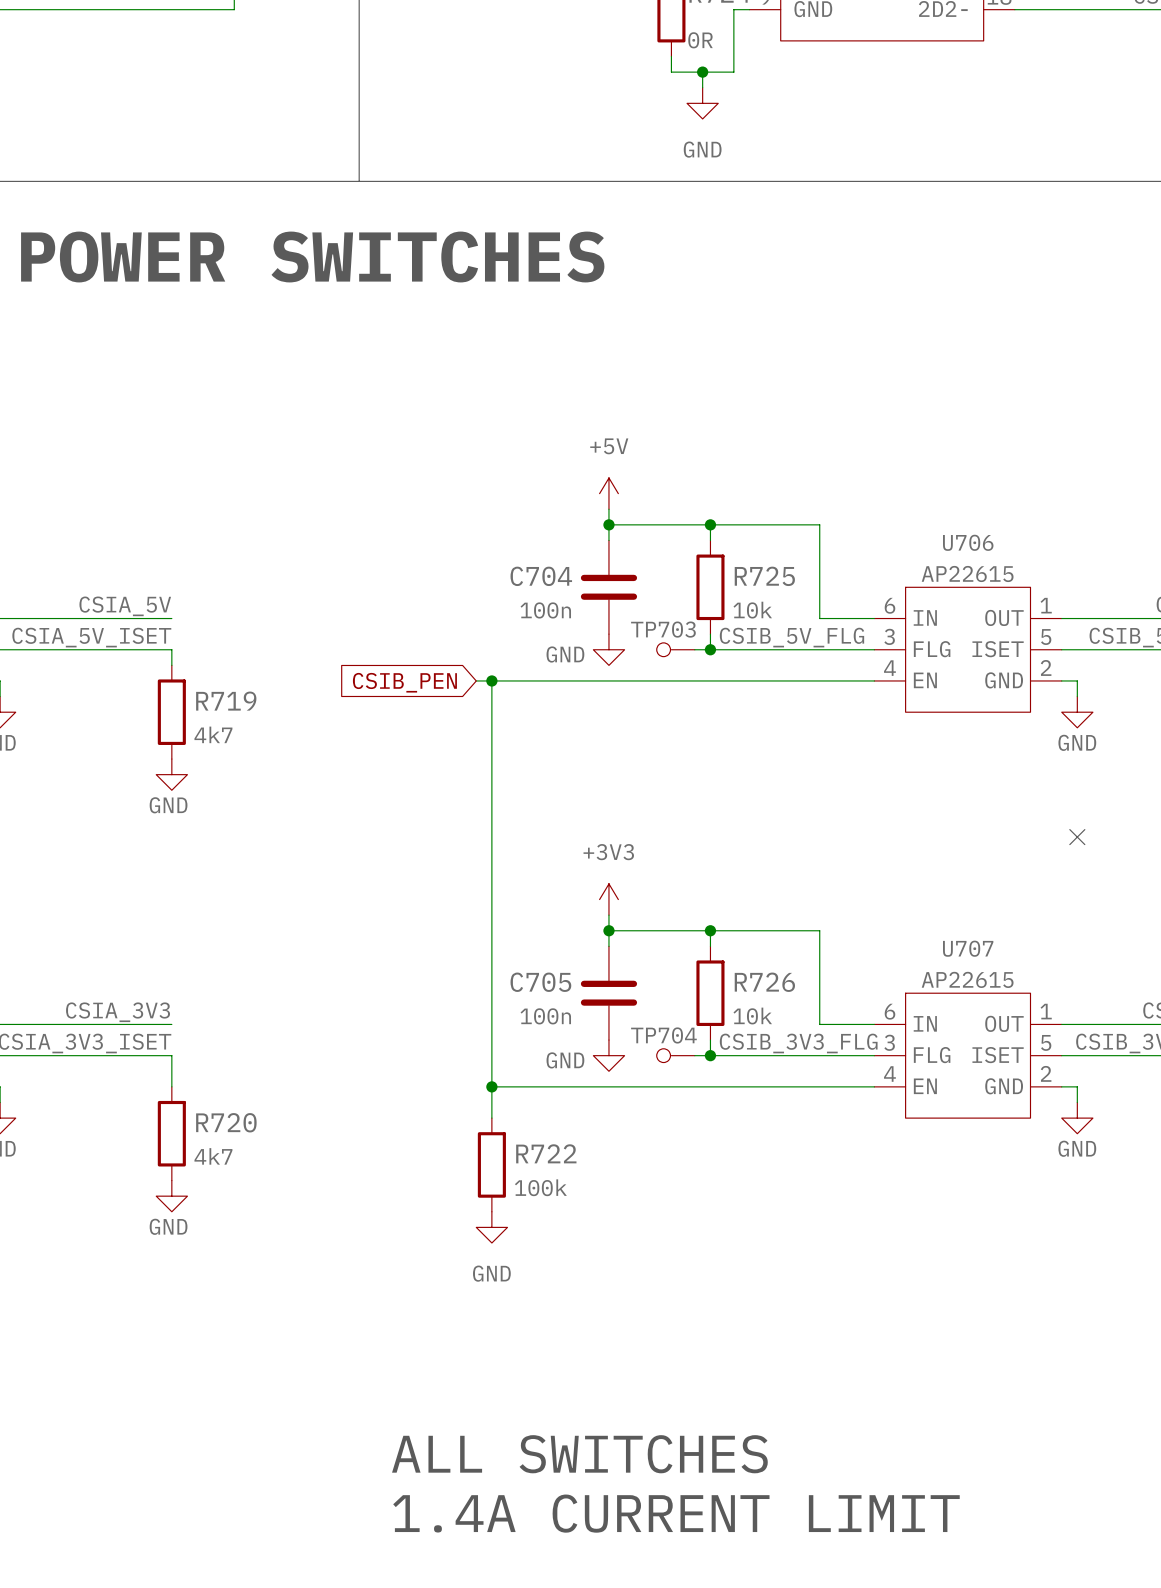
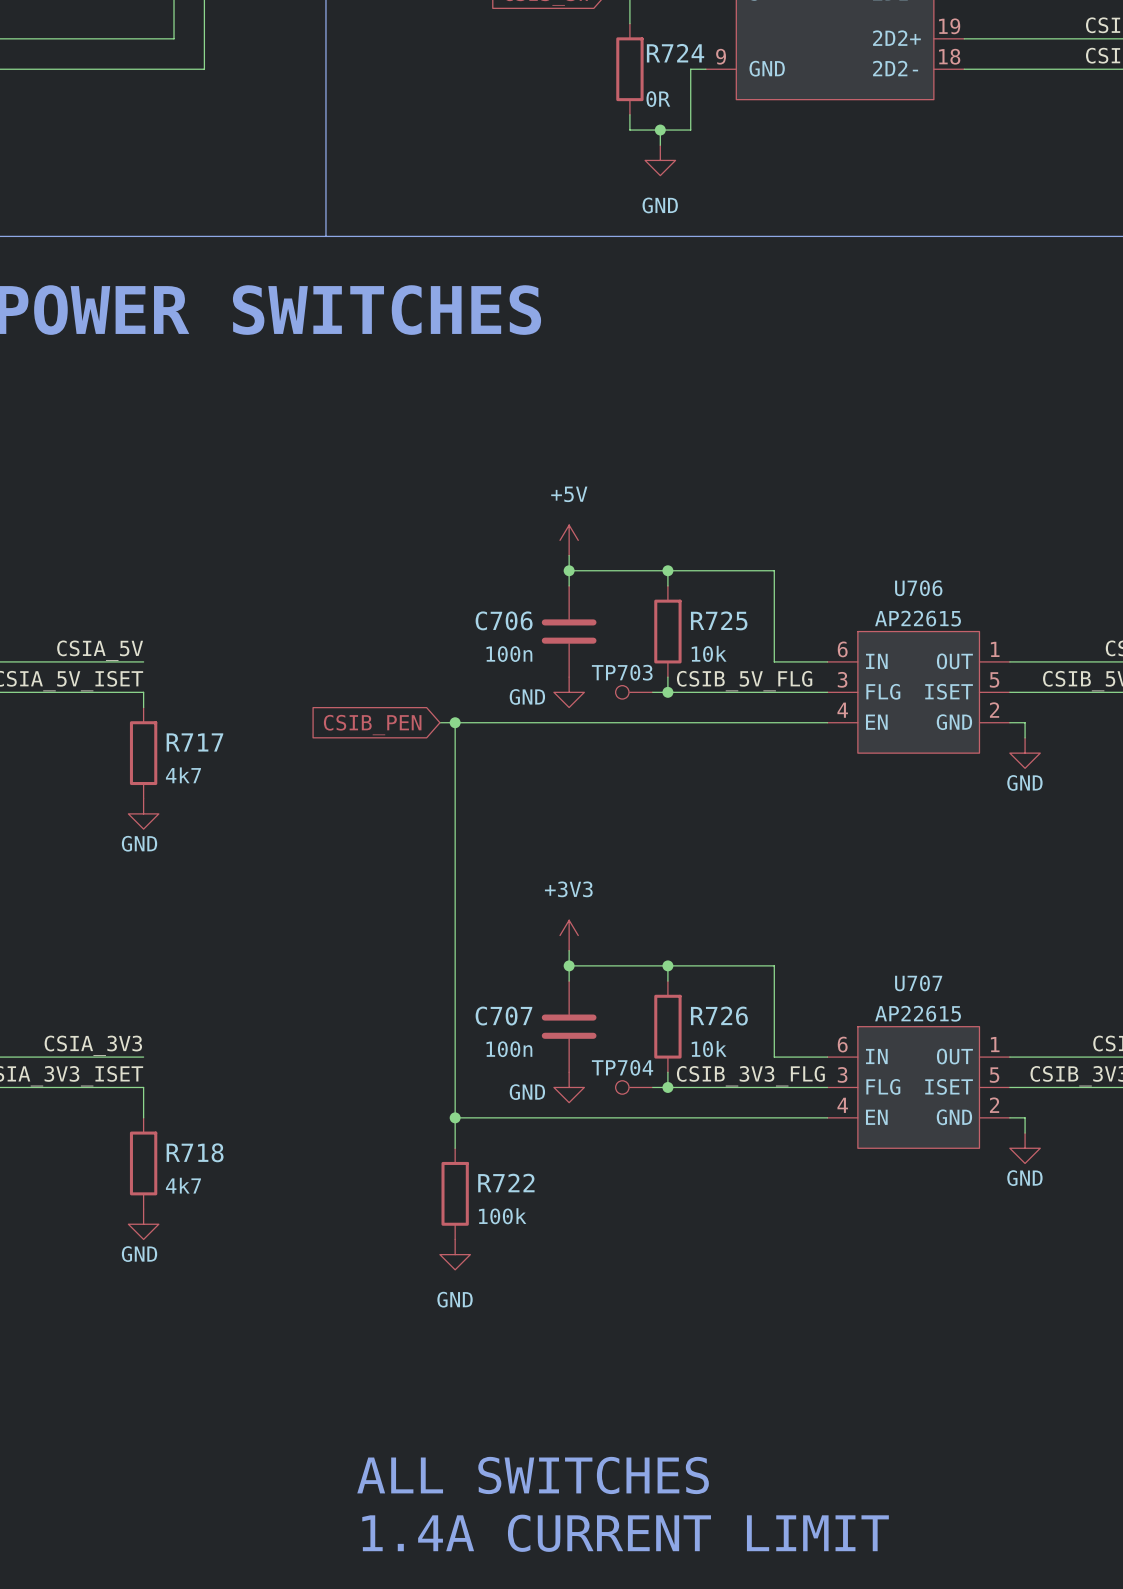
C704 name: C704 (541, 576) -> C706 (504, 620)
R719 name: R719 (226, 701) -> R717 (194, 742)
no-connect mark: (1077, 837) -> none
C705 name: C705 (540, 982) -> C707 (503, 1016)
R720 name: R720 (226, 1122) -> R718 (195, 1152)

